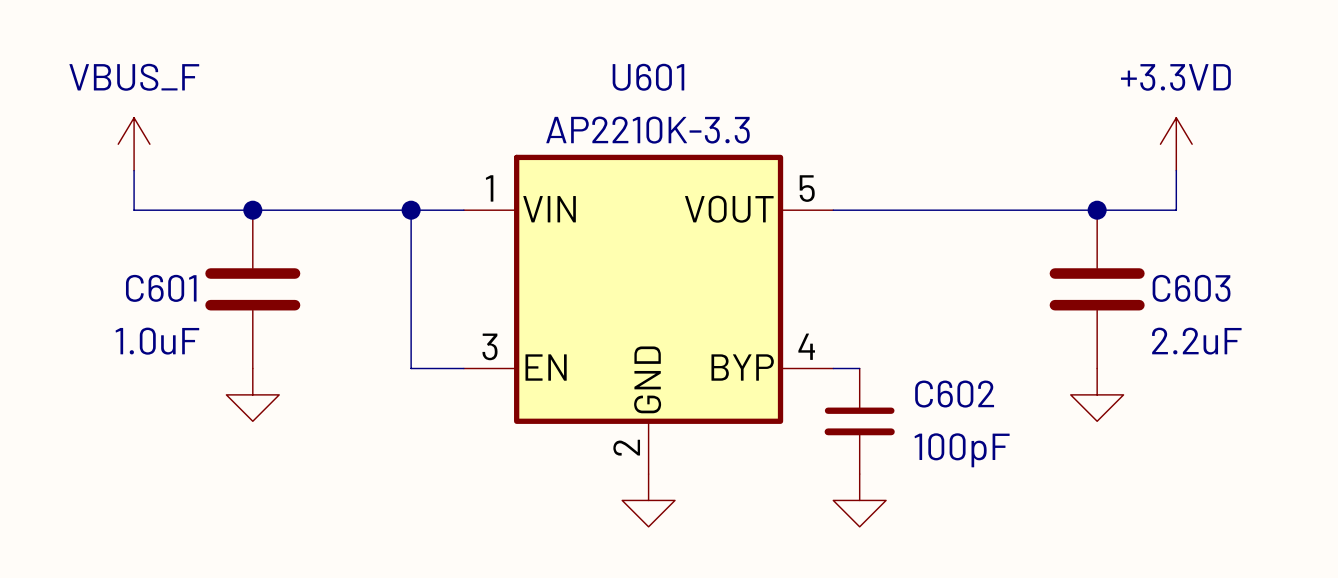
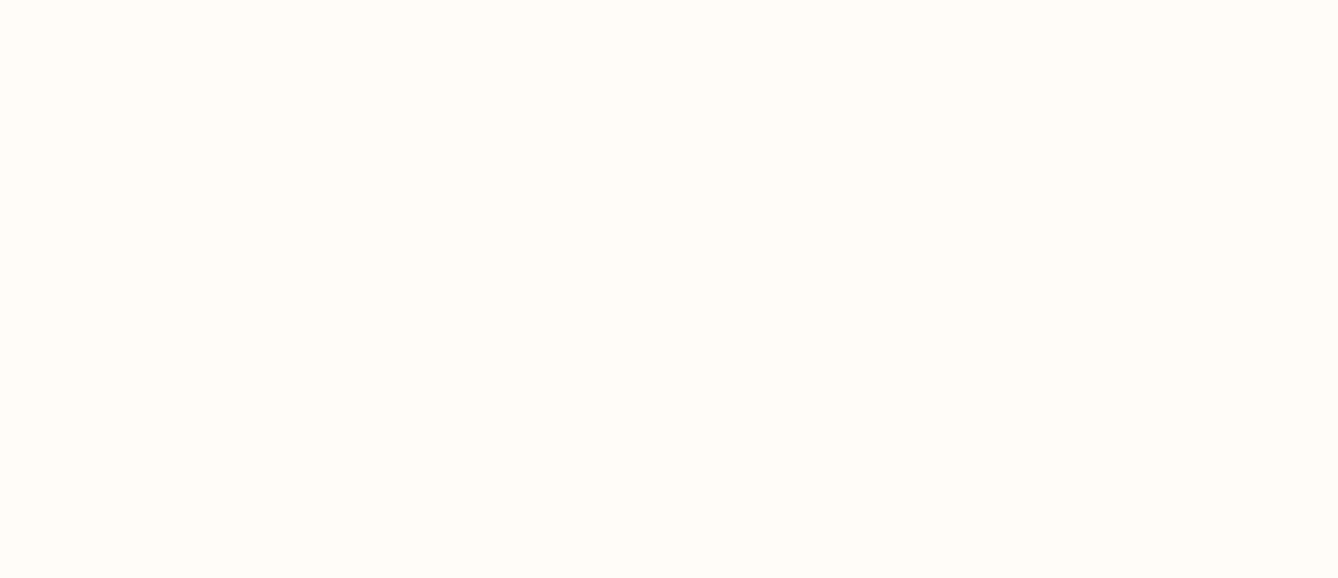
power symbol: VBUS_F (134, 144) -> none
power symbol: +3.3VD (1176, 144) -> none
wire: (134, 170) (134, 210) (463, 210) -> none
wire: (1176, 170) (1176, 210) (833, 210) -> none
junction: (252, 210) -> none
wire: (411, 210) (411, 368) (463, 368) -> none
junction: (411, 210) -> none
junction: (1097, 210) -> none
C601: 1.0uF (252, 289) -> none
C603: 2.2uF (1097, 289) -> none
U601: AP2210K-3.3 (648, 314) -> none
wire: (833, 368) (859, 368) -> none
power symbol: (252, 394) -> none
power symbol: (1097, 394) -> none
C602: 100pF (859, 421) -> none
power symbol: (648, 500) -> none
power symbol: (859, 500) -> none

